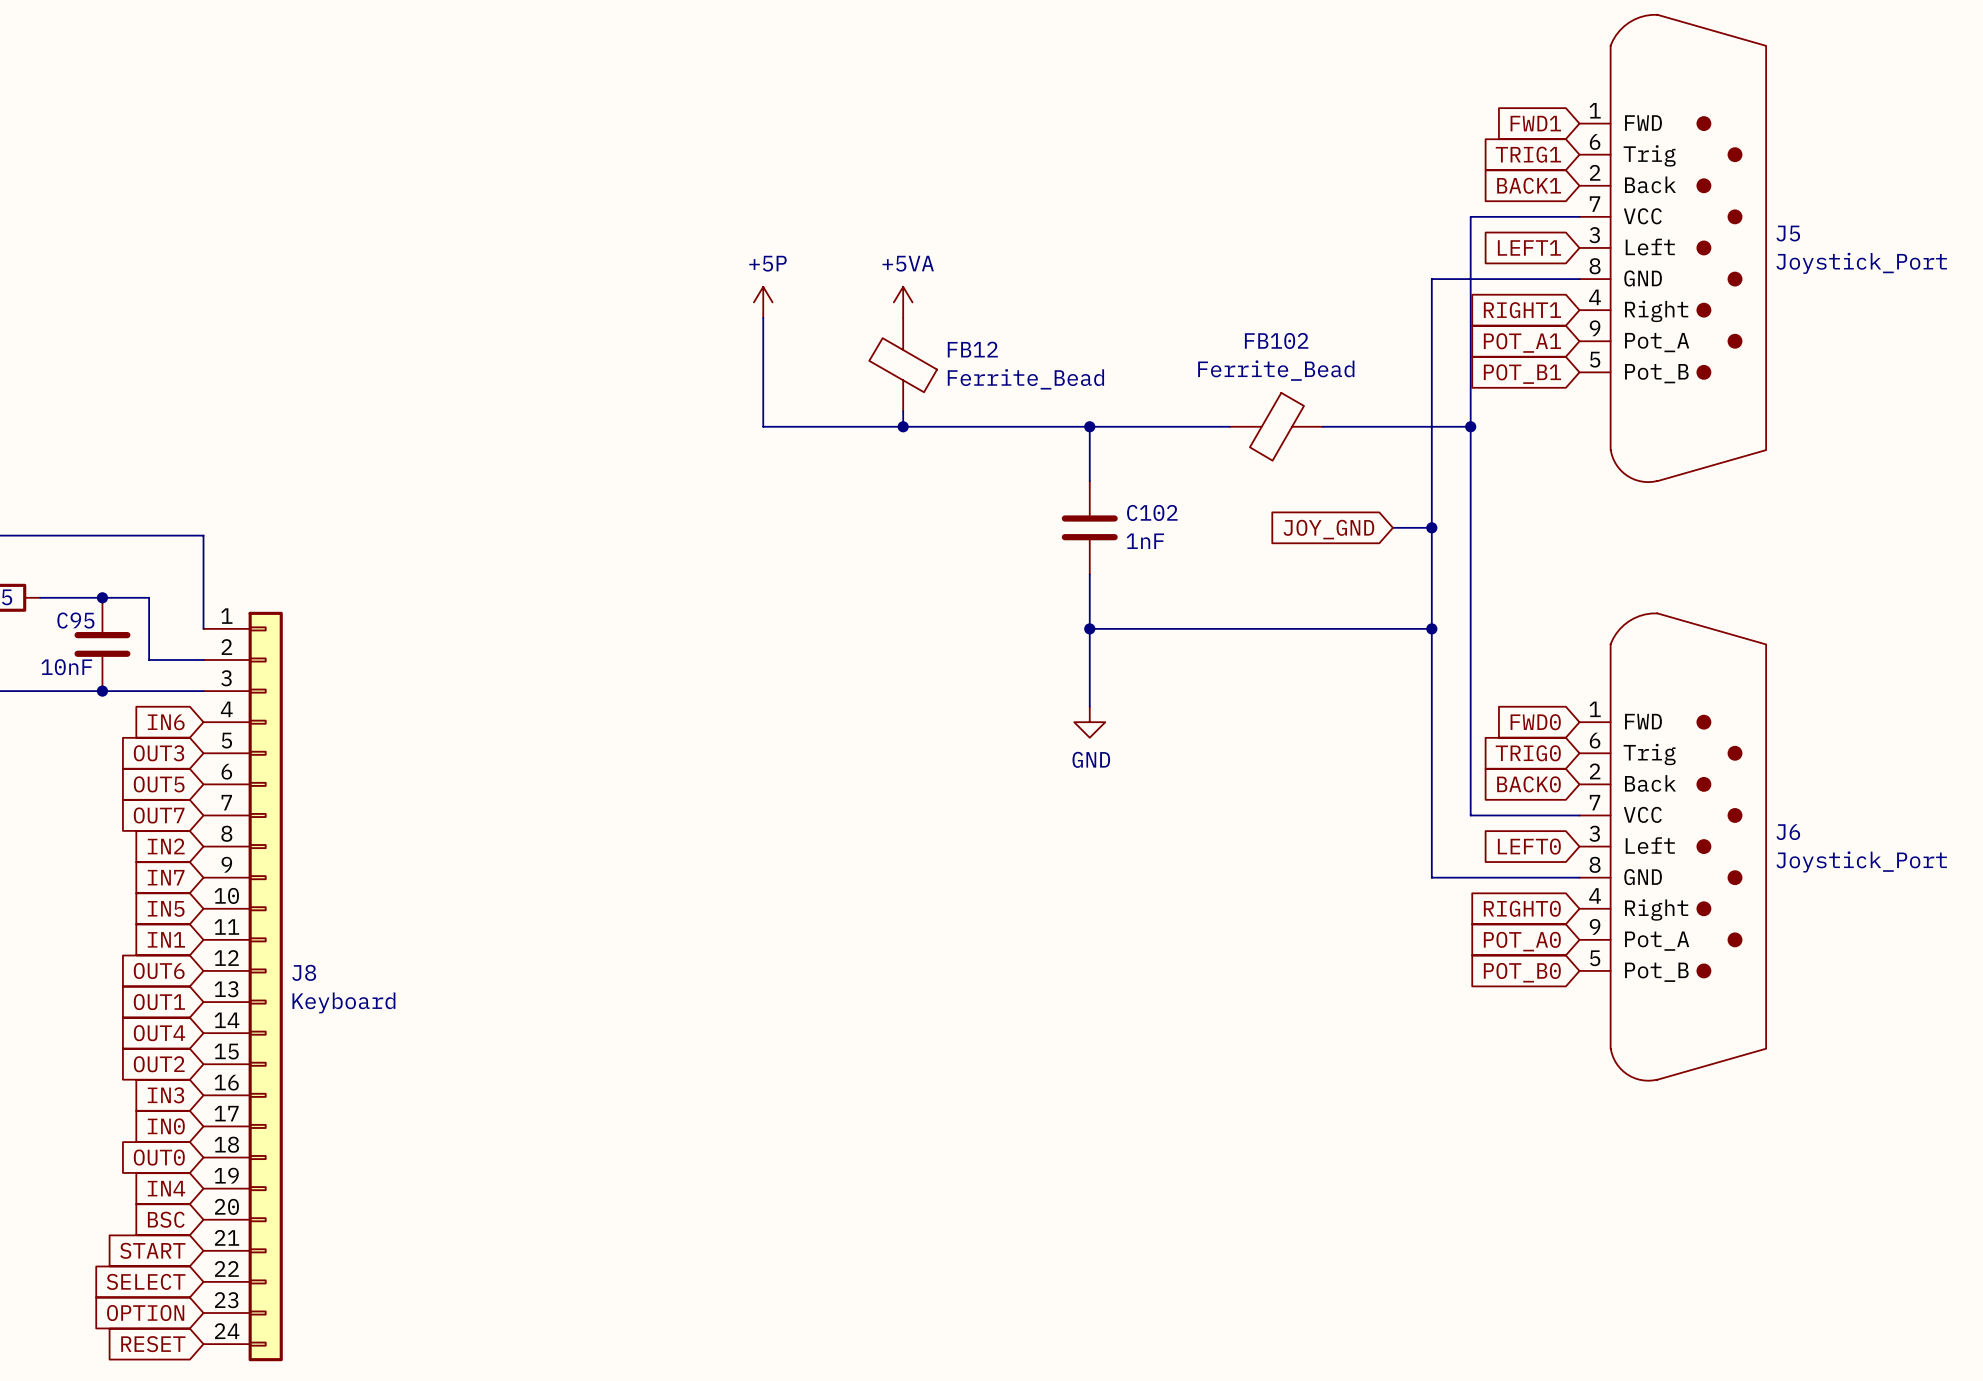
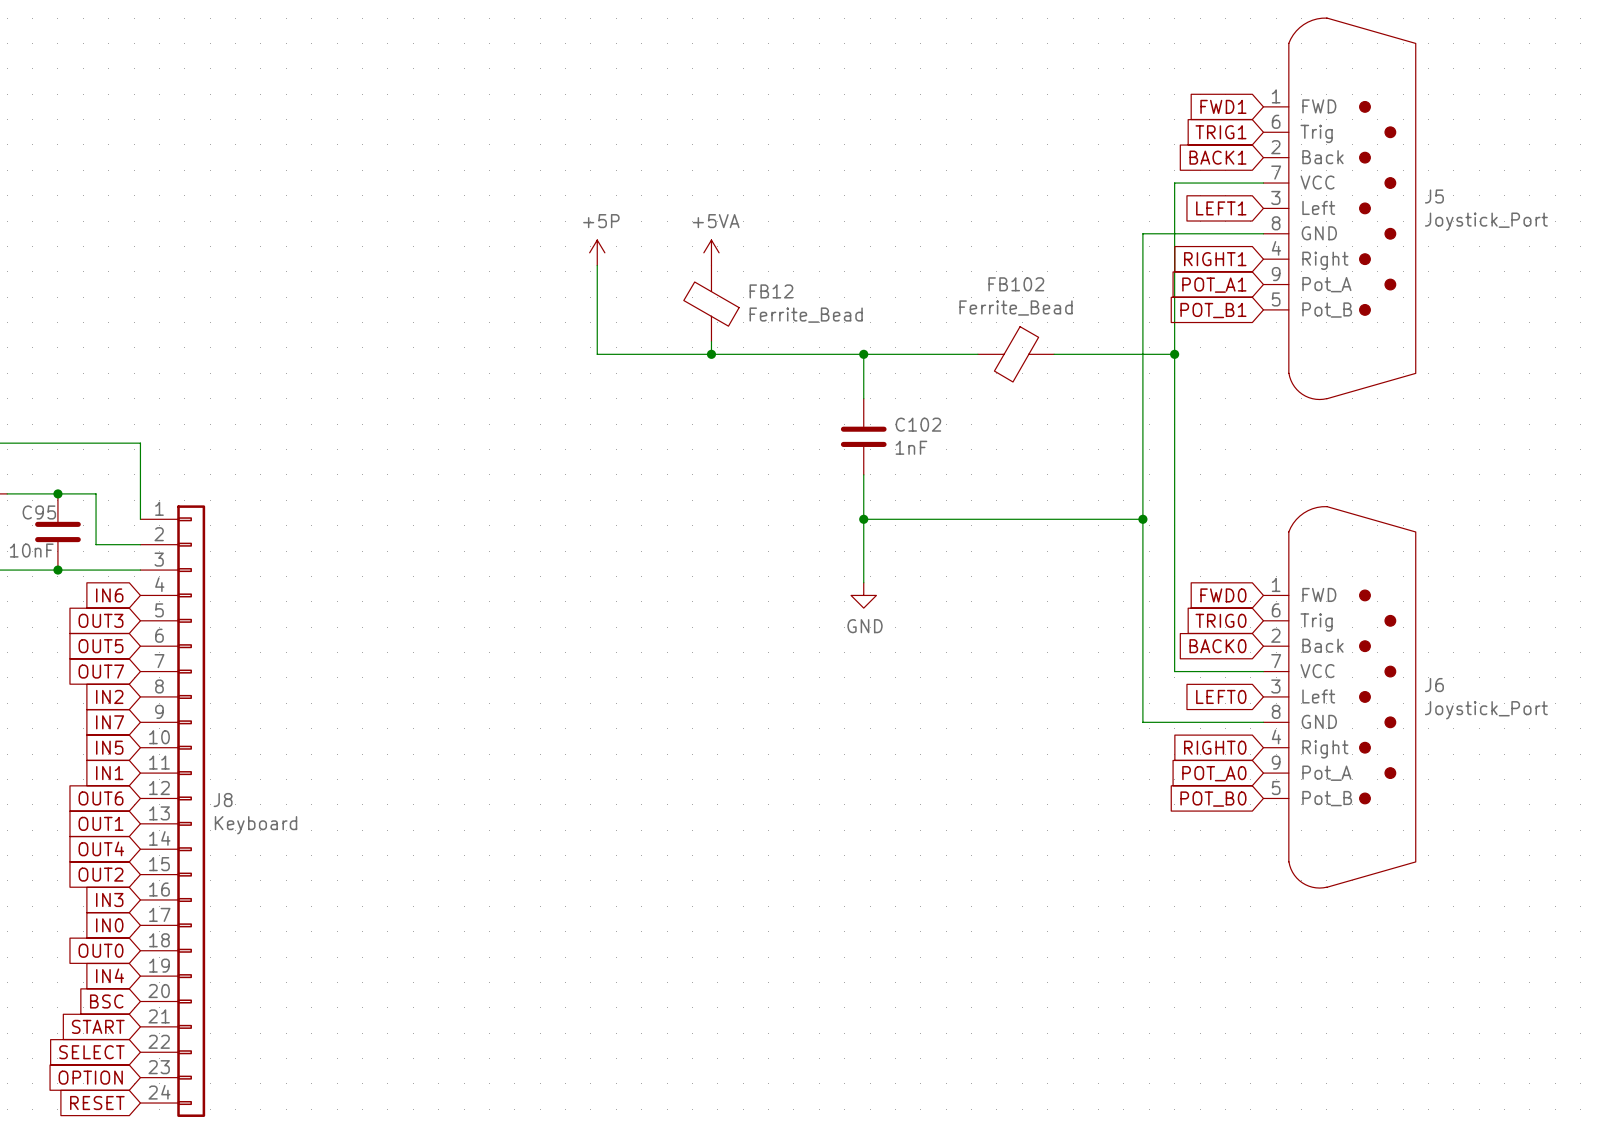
wire: (1392, 527) (1431, 527) -> none
junction: (1431, 527) -> none
global label: JOY_GND (1328, 529) -> none

